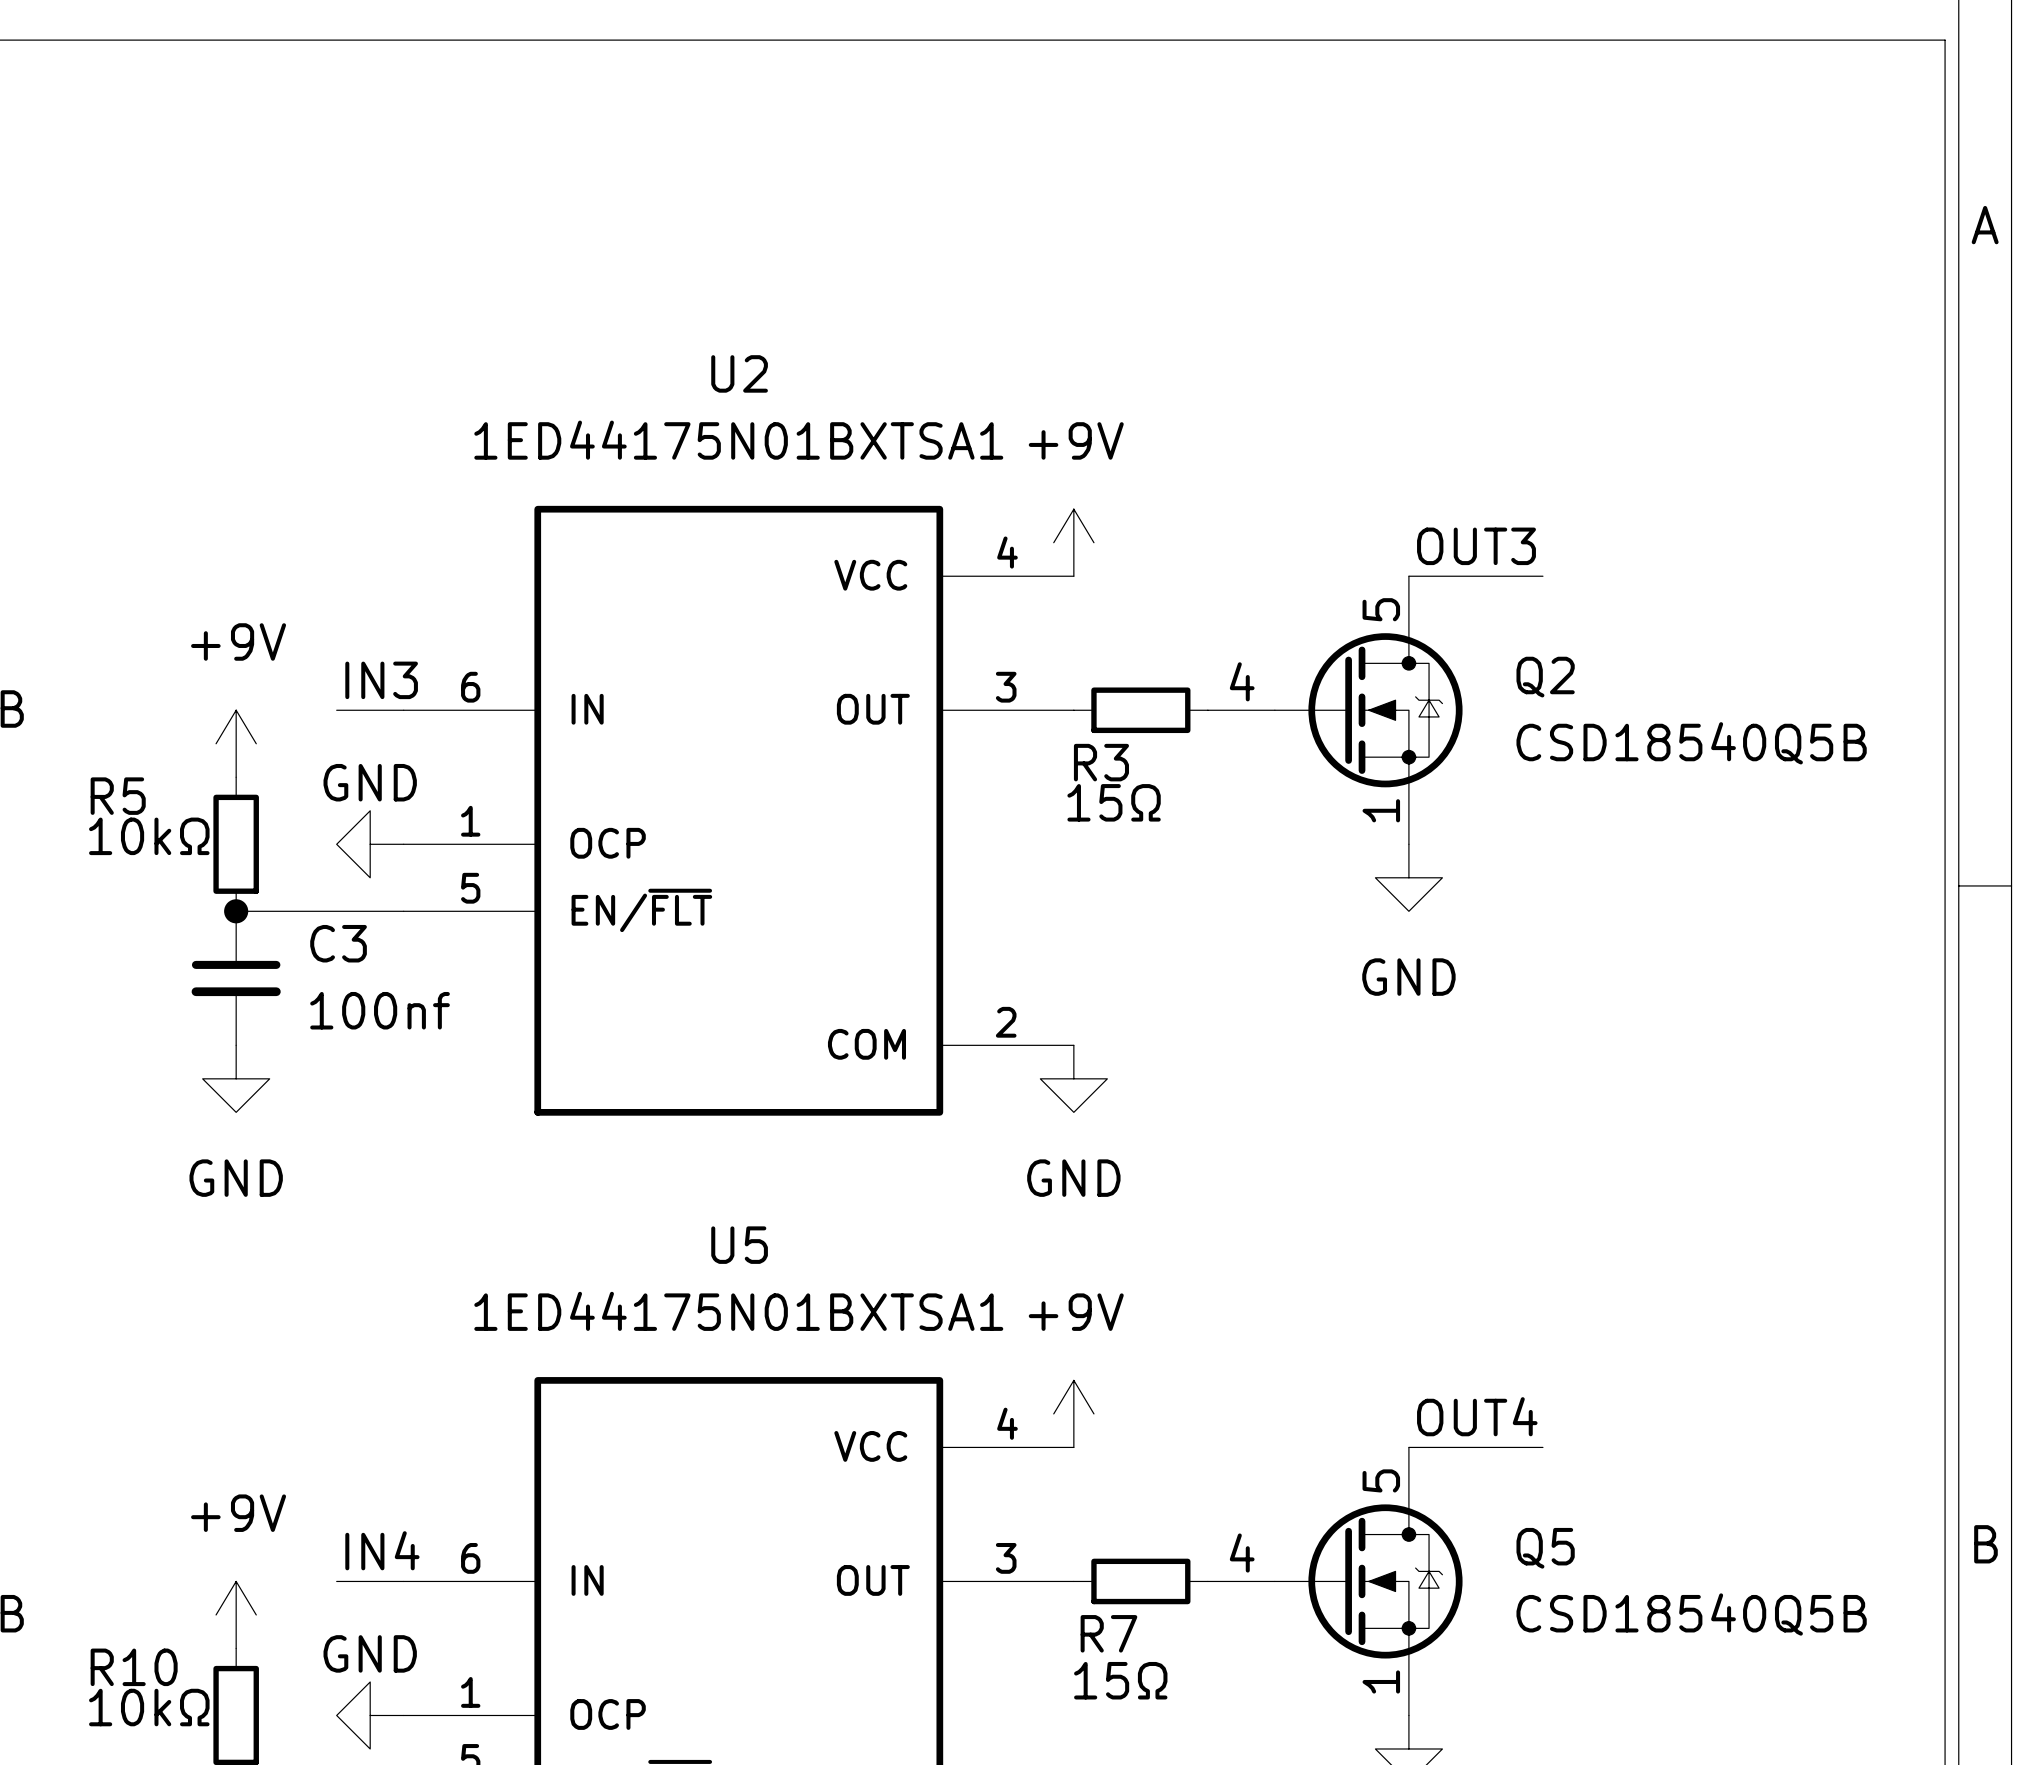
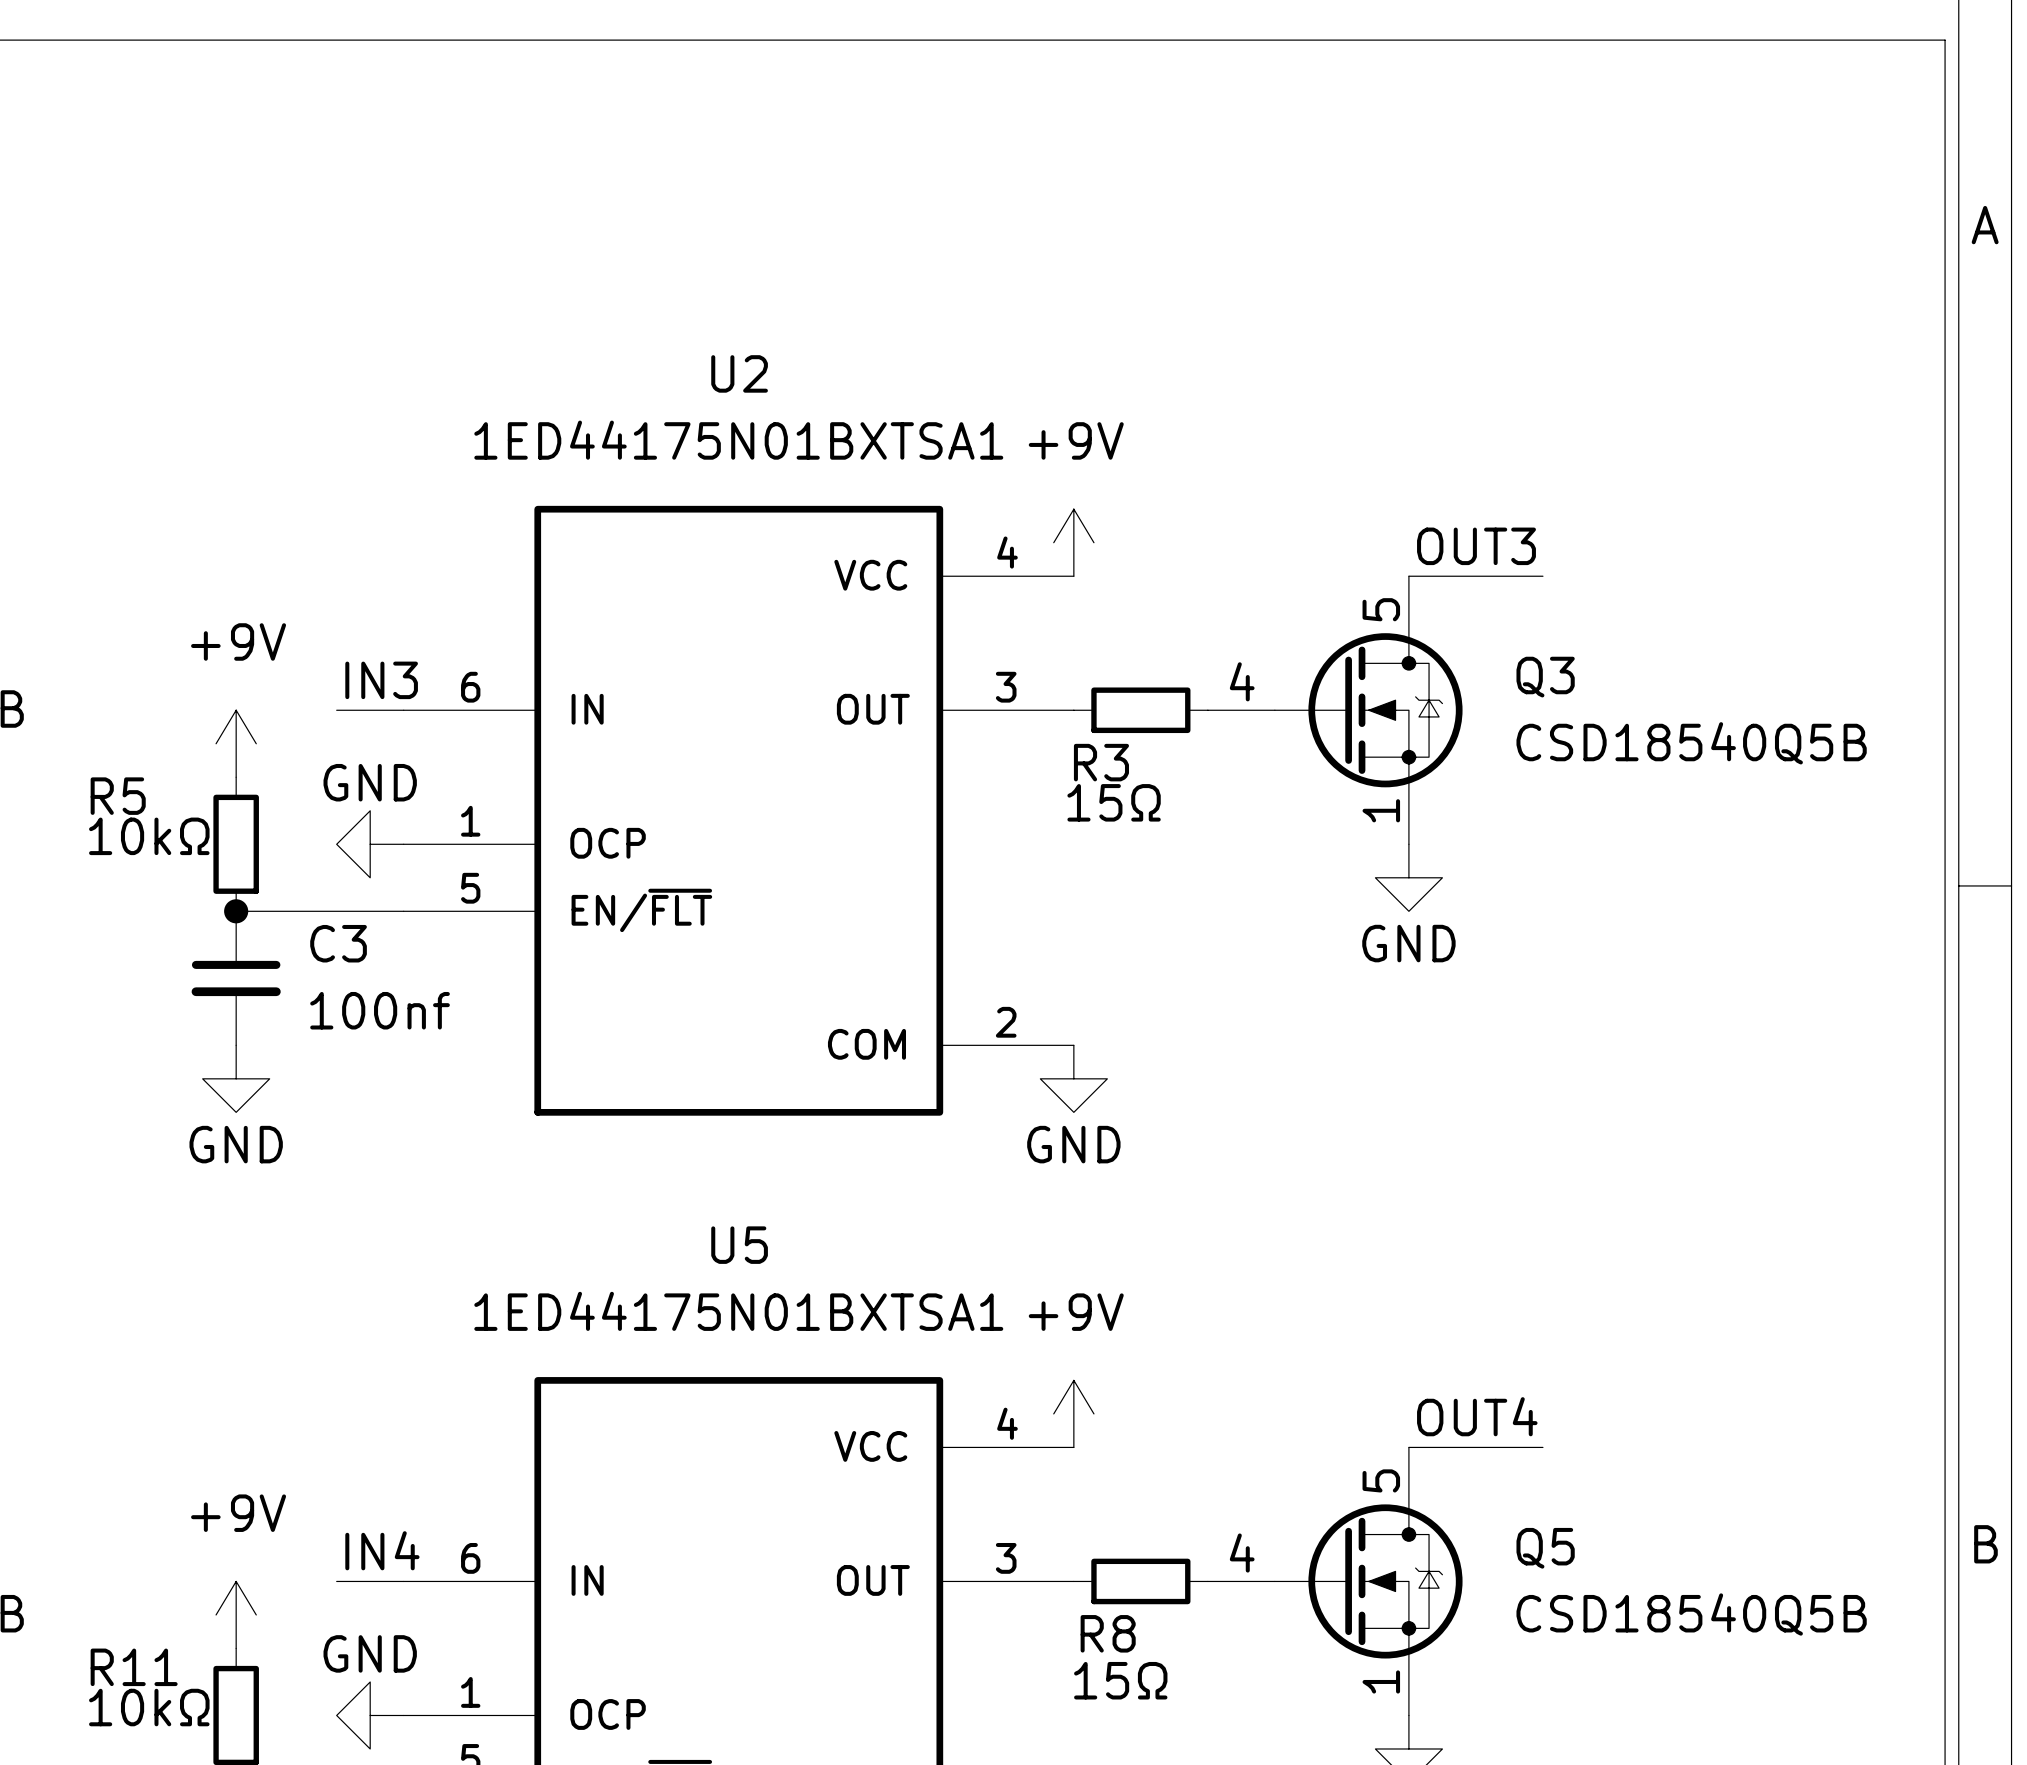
Q2 name: Q2 (1545, 677) -> Q3 (1545, 677)
power symbol text position: GND (1408, 977) -> GND (1408, 943)
power symbol text position: GND (236, 1178) -> GND (236, 1144)
power symbol text position: GND (1073, 1178) -> GND (1073, 1144)
R7 name: R7 (1108, 1633) -> R8 (1108, 1633)
R10 name: R10 (134, 1667) -> R11 (134, 1667)

